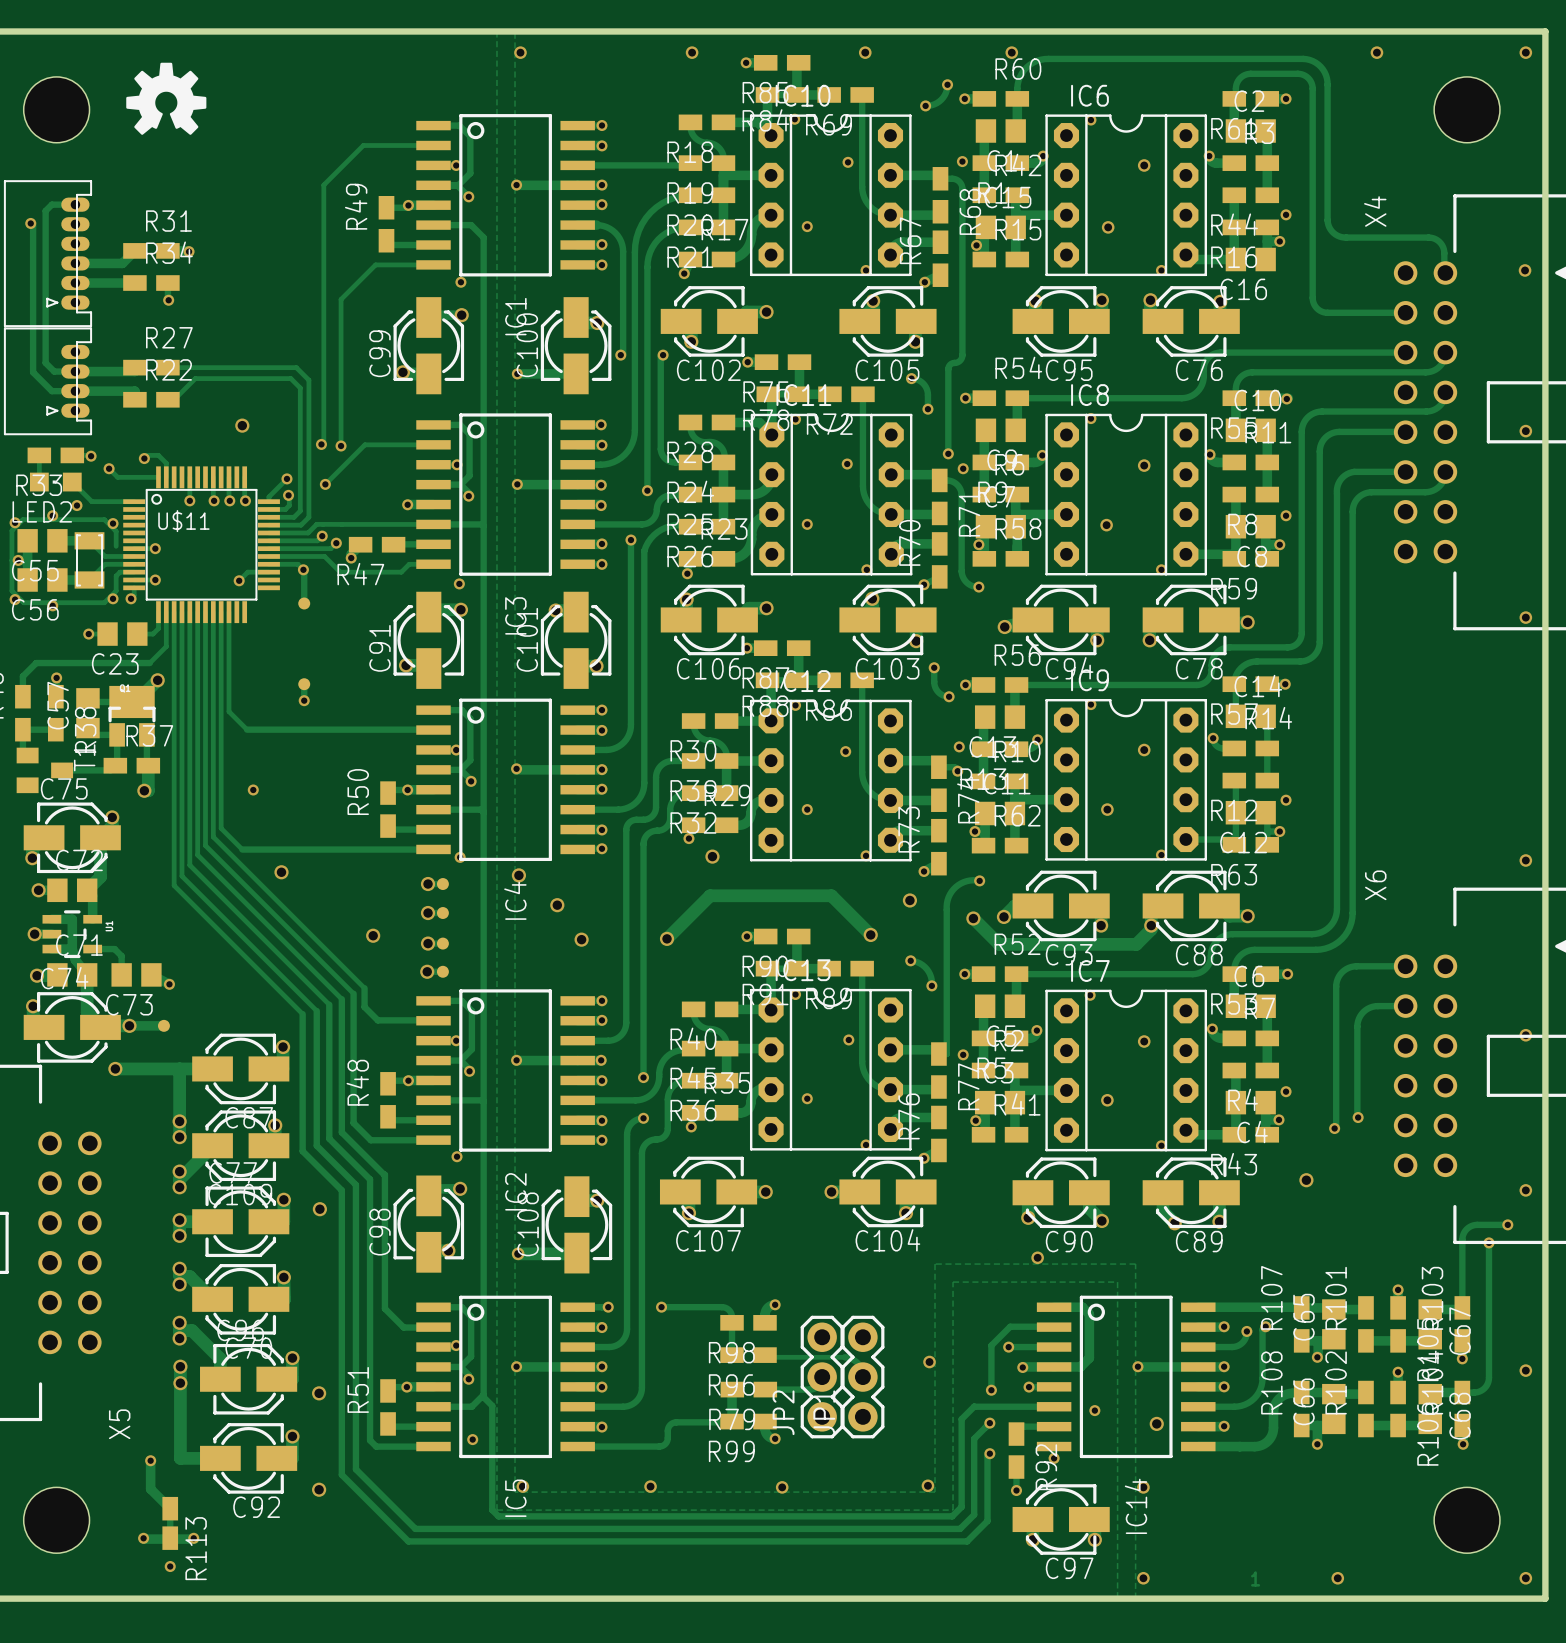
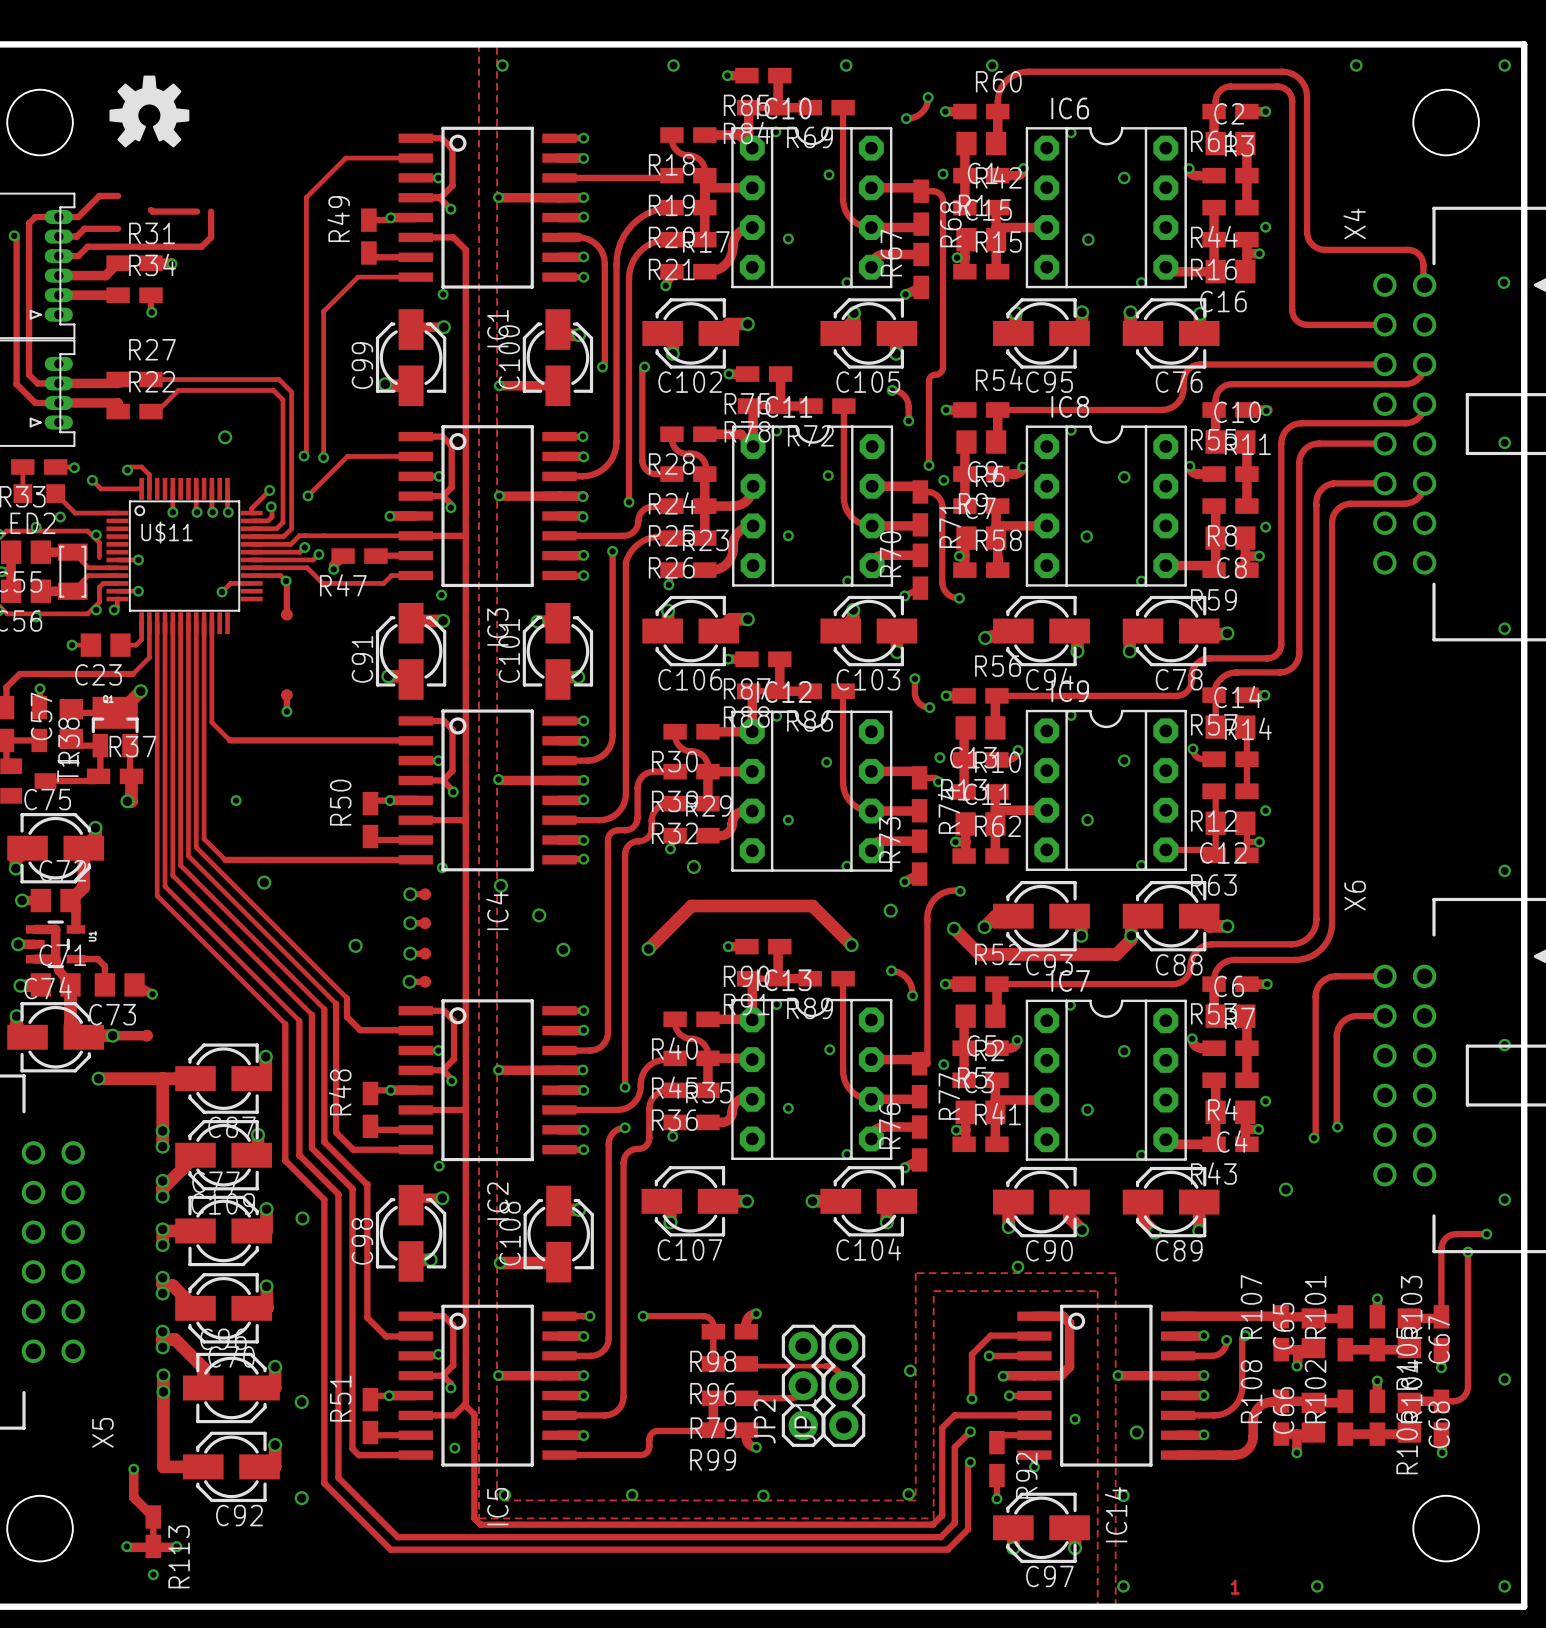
track: none -> (118, 195) (99, 195) (78, 217) (58, 217)
track: none -> (151, 210) (152, 211) (197, 211)
track: none -> (211, 211) (211, 237) (201, 246) (87, 246) (78, 256) (58, 256)
track: none -> (118, 228) (84, 228) (76, 236) (58, 236)

